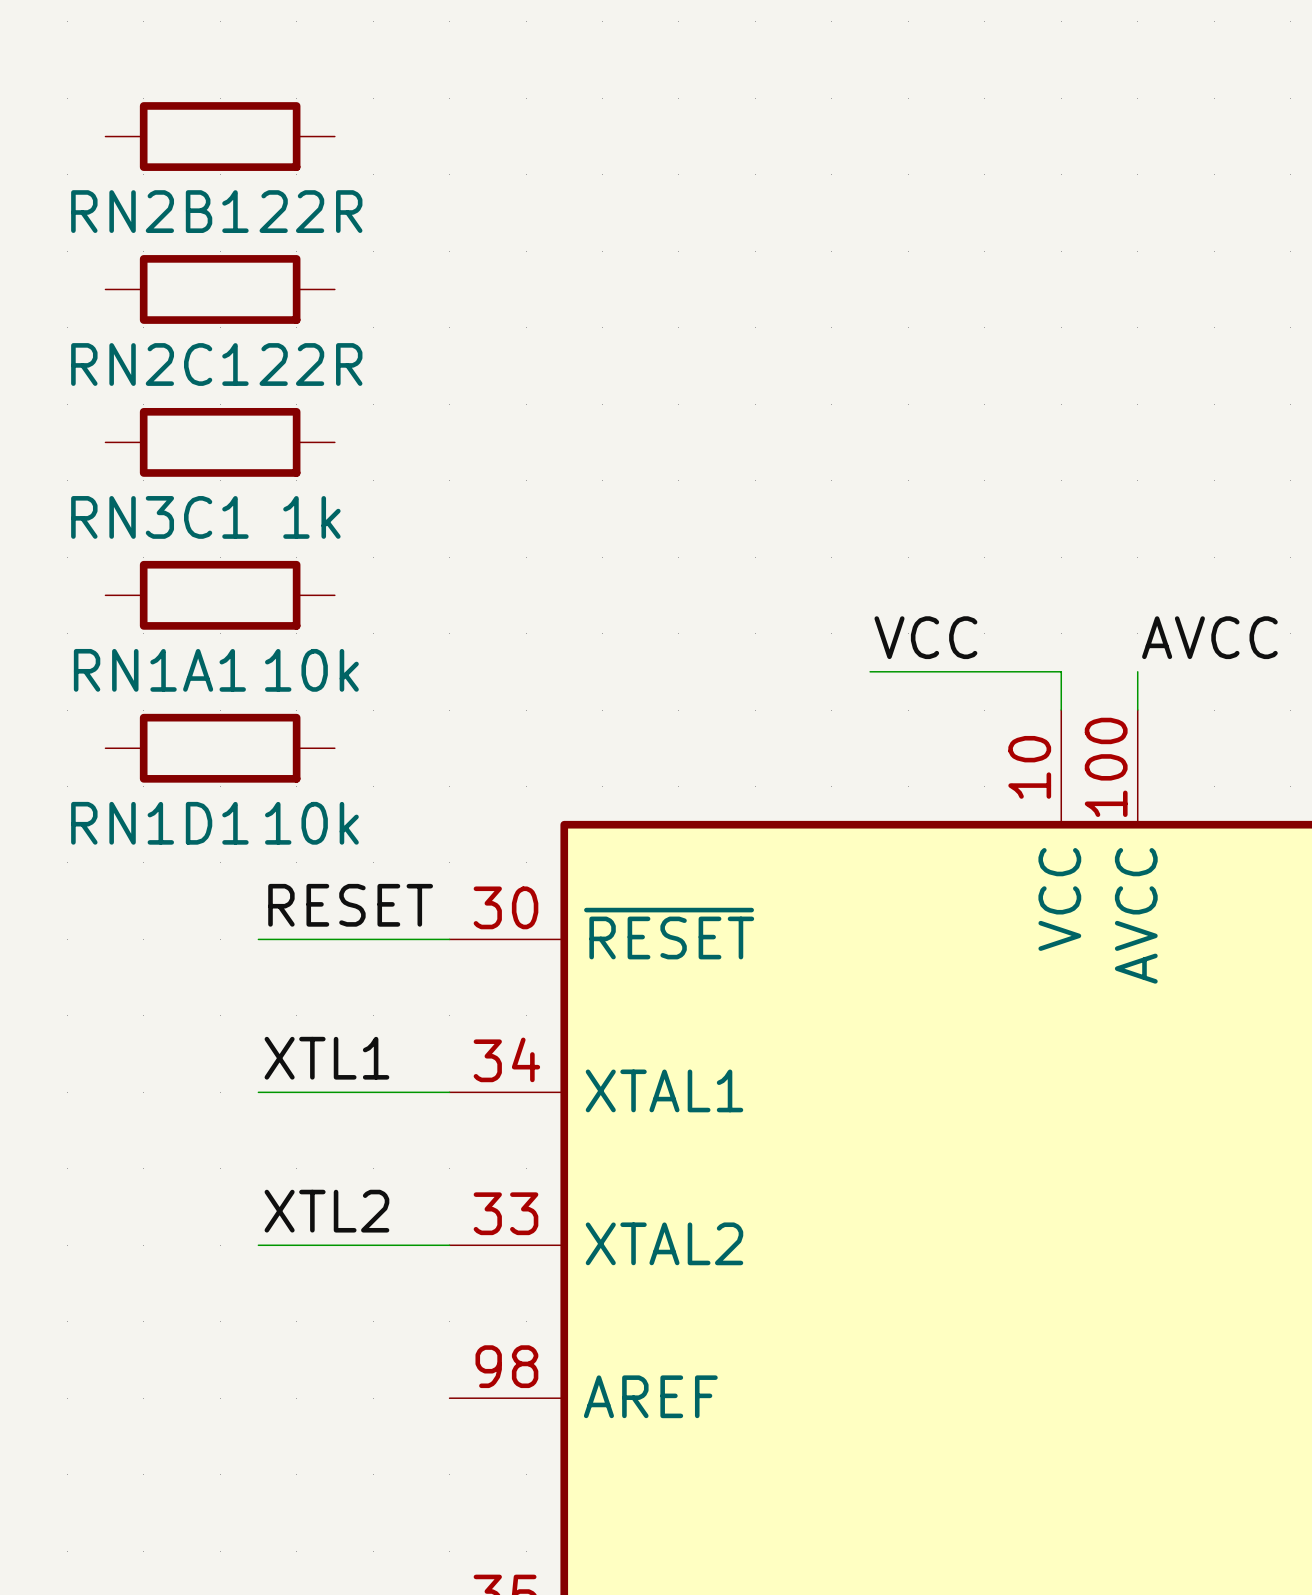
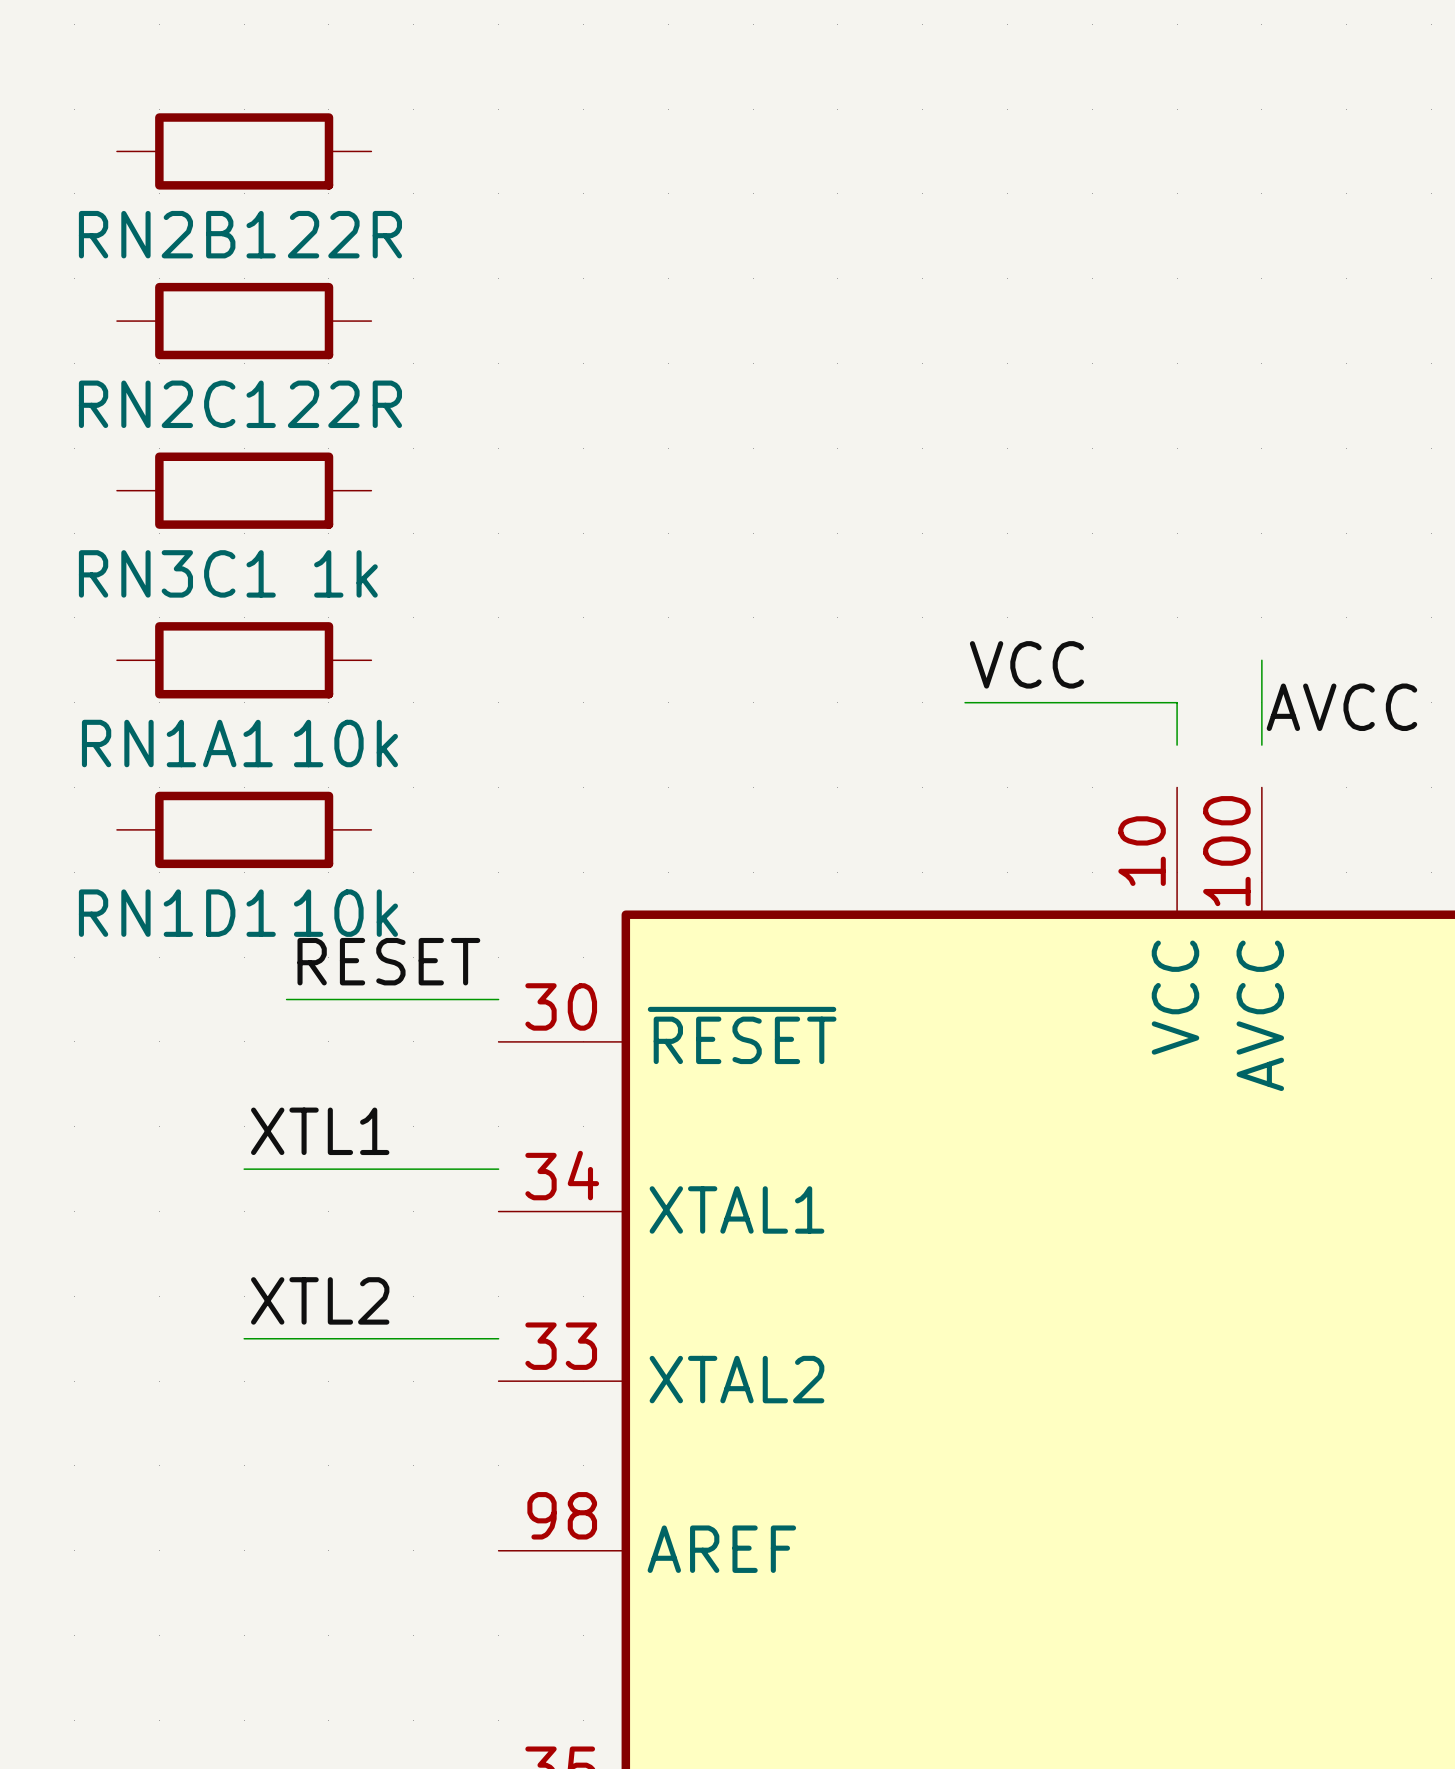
label position: VCC (925, 637) -> VCC (1026, 664)
wire: (870, 671) (1061, 671) (1061, 710) -> (965, 702) (1177, 702) (1177, 745)
wire: (1137, 671) (1137, 710) -> (1261, 745) (1261, 660)
label position: RESET (350, 905) -> RESET (388, 961)
wire: (258, 939) (449, 939) -> (286, 999) (498, 999)
wire: none -> (244, 1169) (498, 1169)
label position: XTL1 (326, 1058) -> XTL1 (320, 1131)
wire: (258, 1092) (449, 1092) -> none
wire: none -> (244, 1338) (498, 1338)
label position: XTL2 (326, 1211) -> XTL2 (320, 1300)
wire: (258, 1245) (449, 1245) -> none

